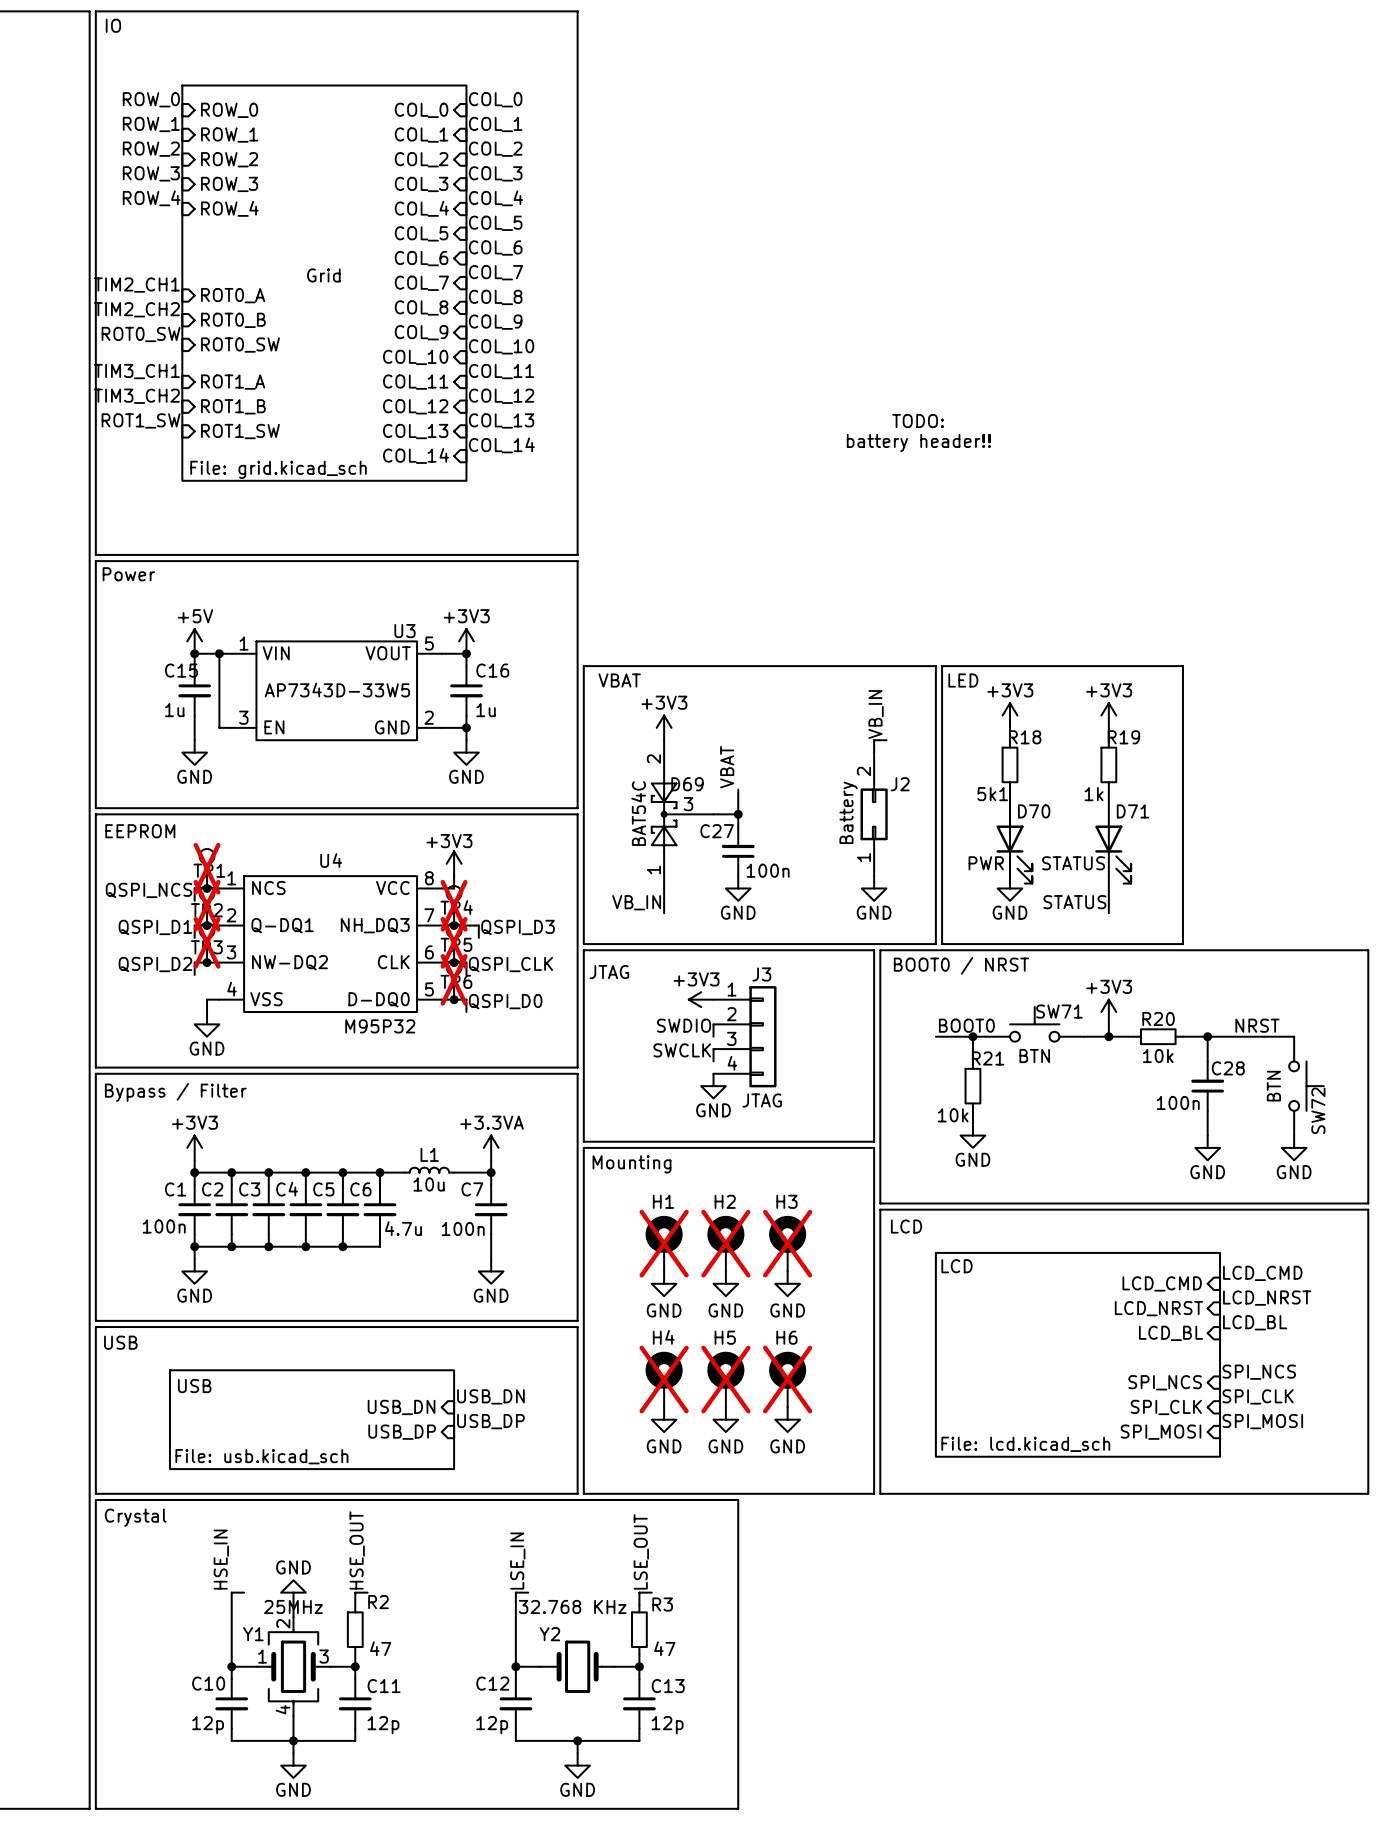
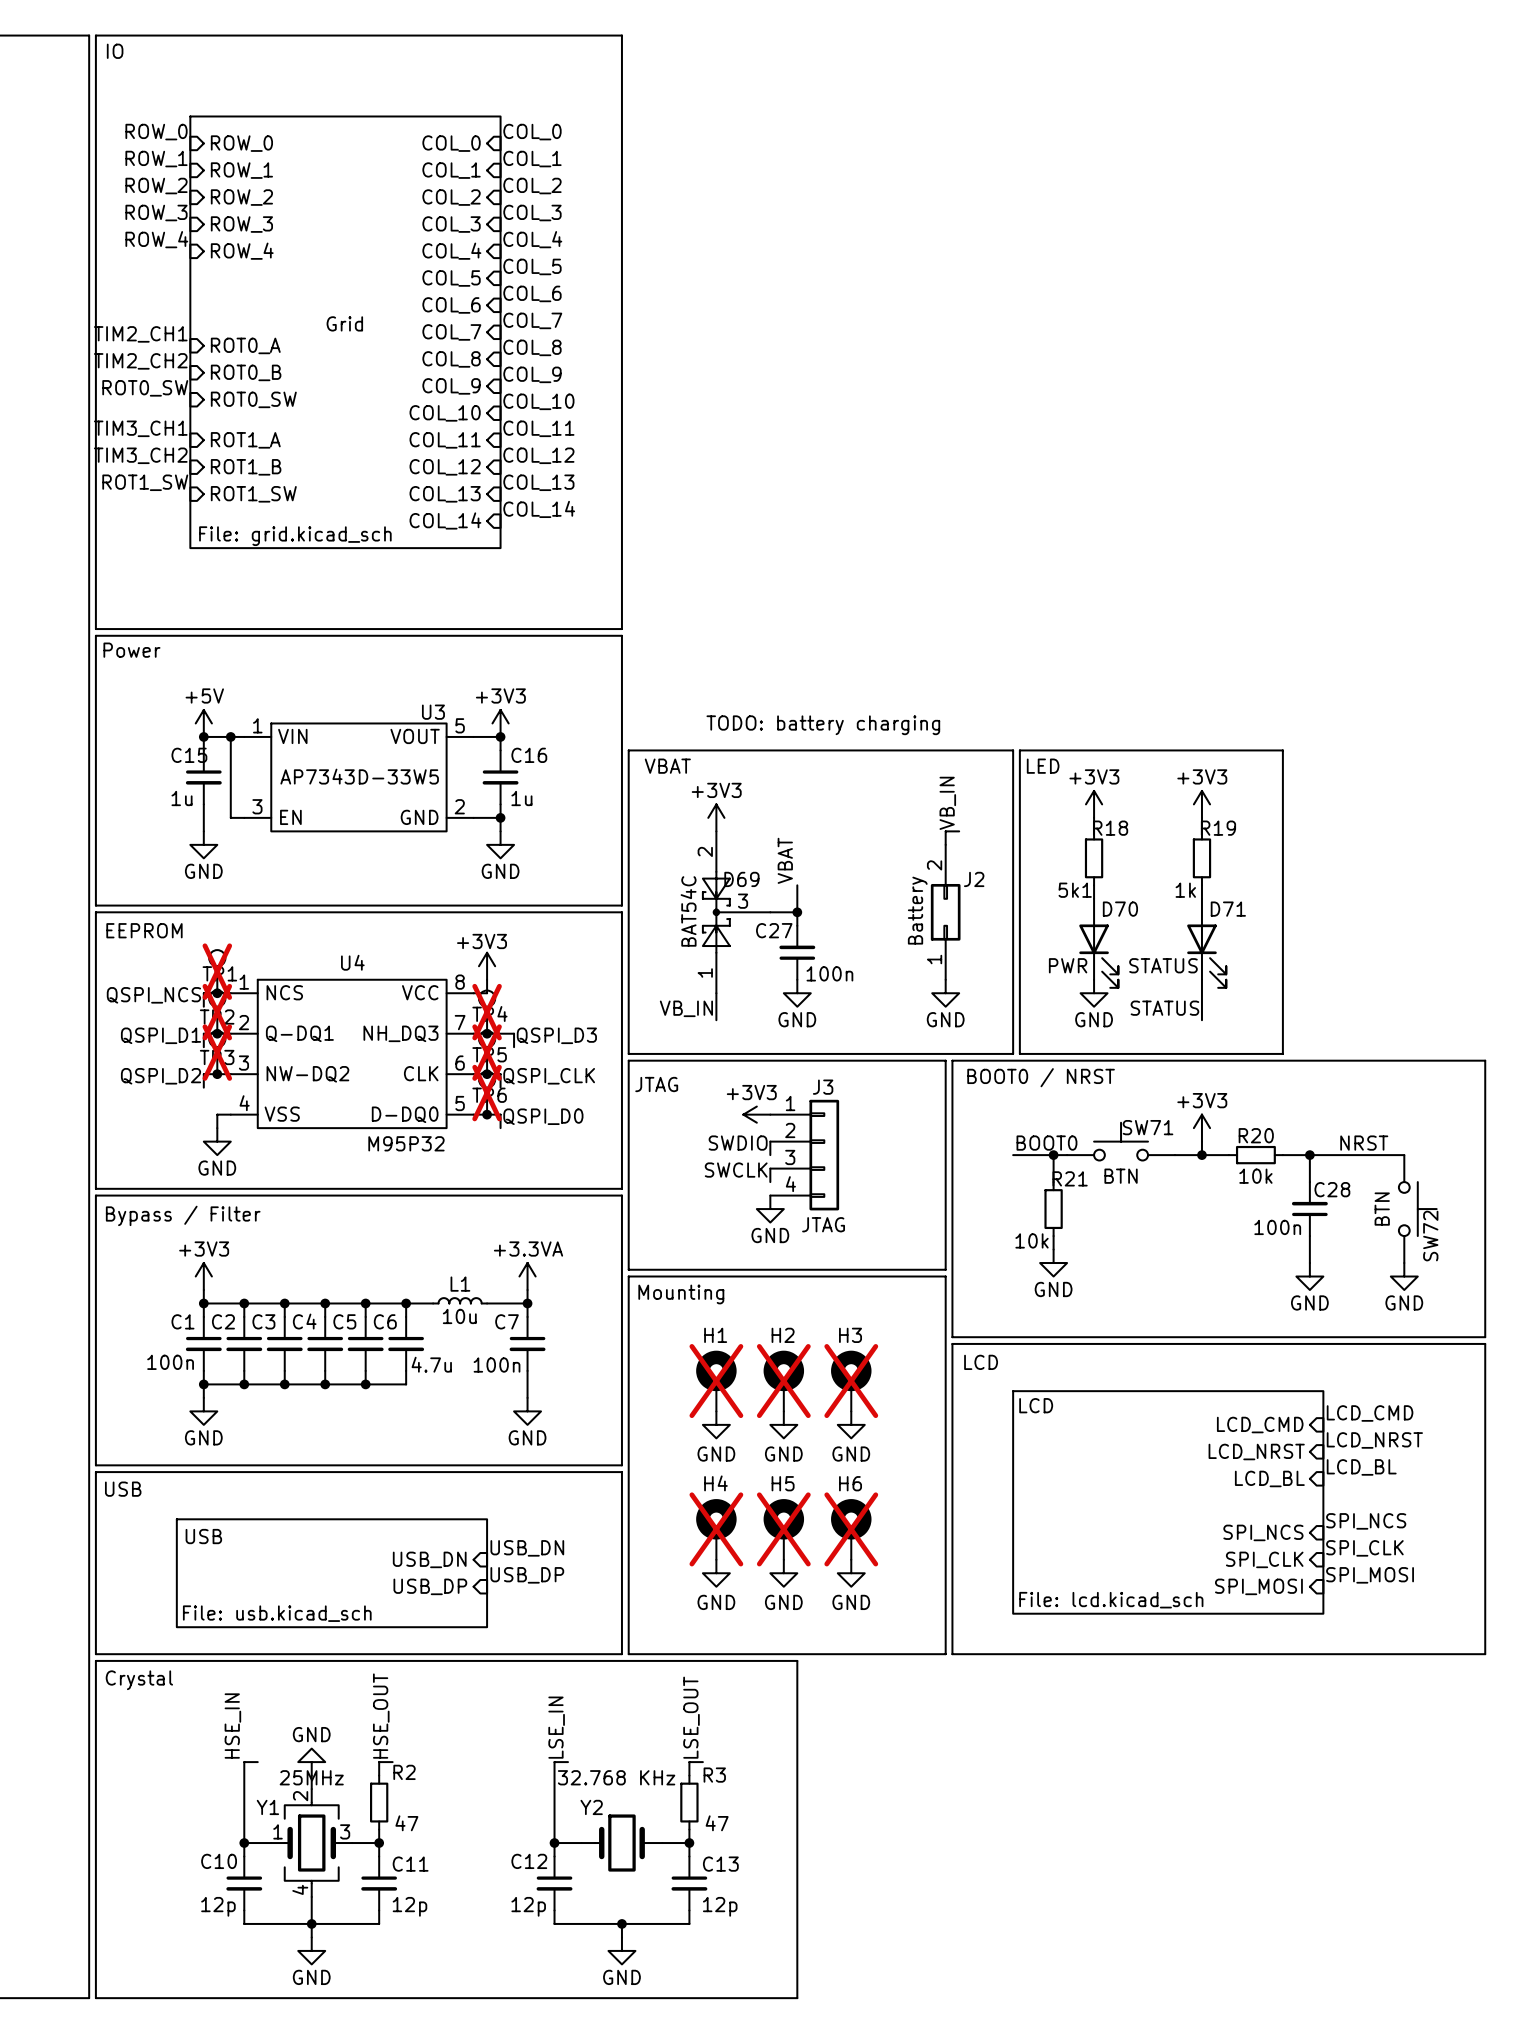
text: TODO: (918, 421) -> none
text: battery header!! (918, 442) -> none
text: none -> TODO: battery charging (823, 725)

